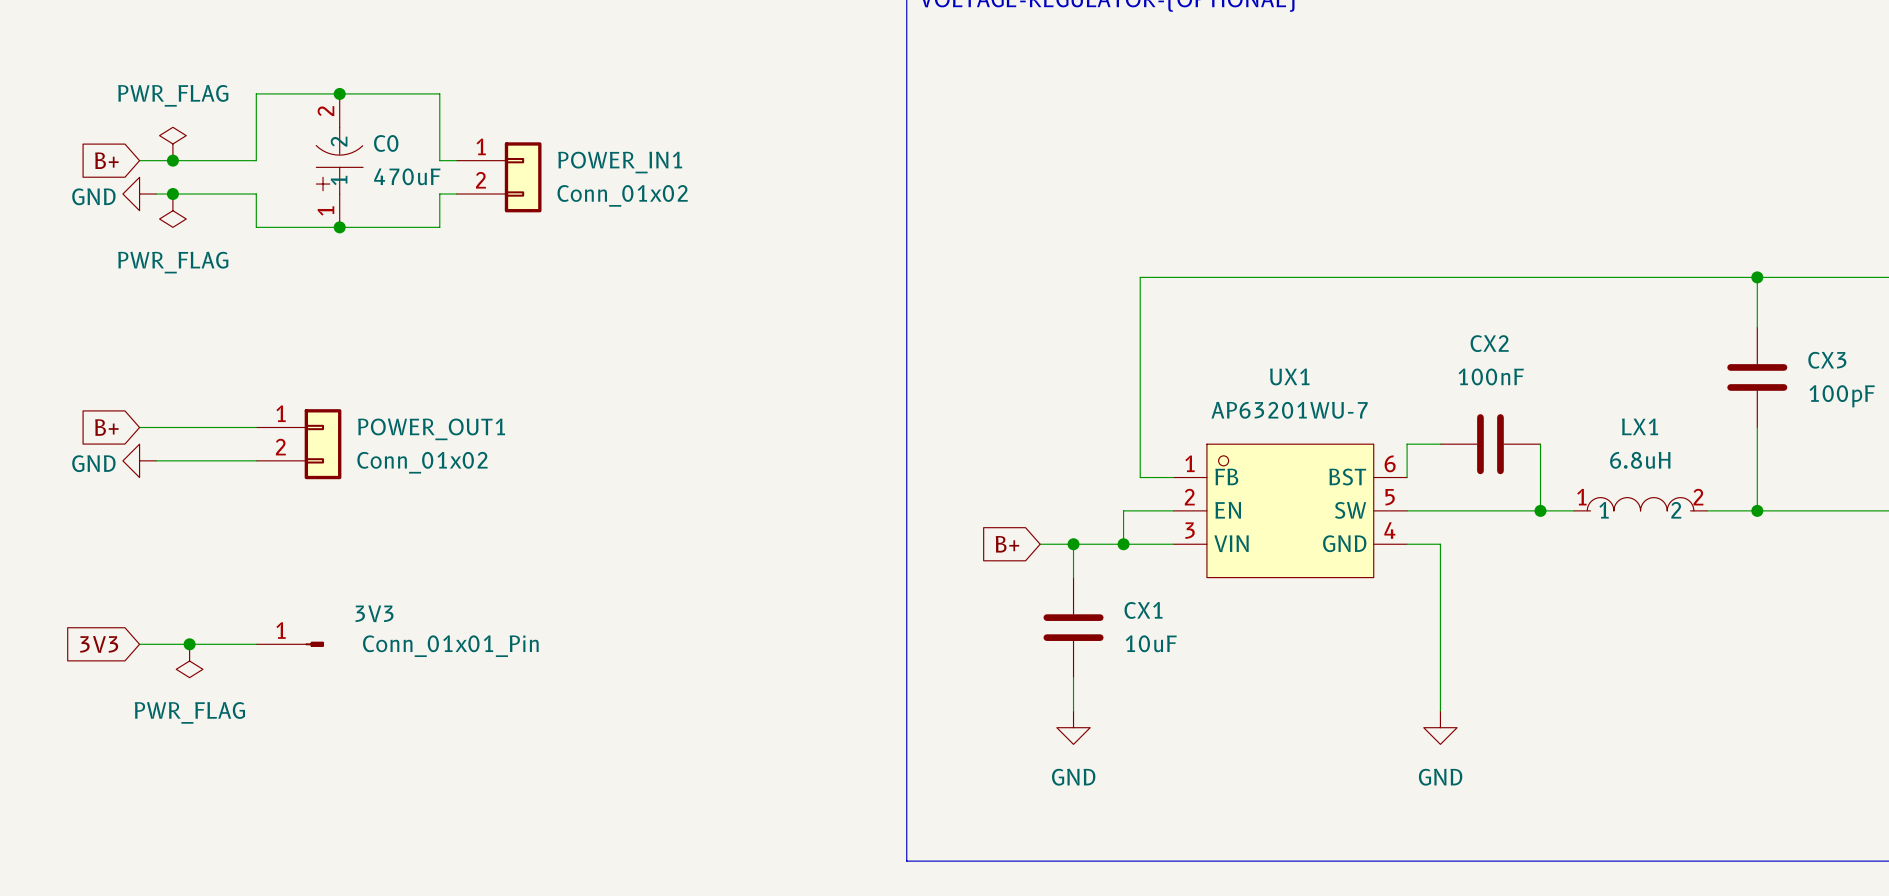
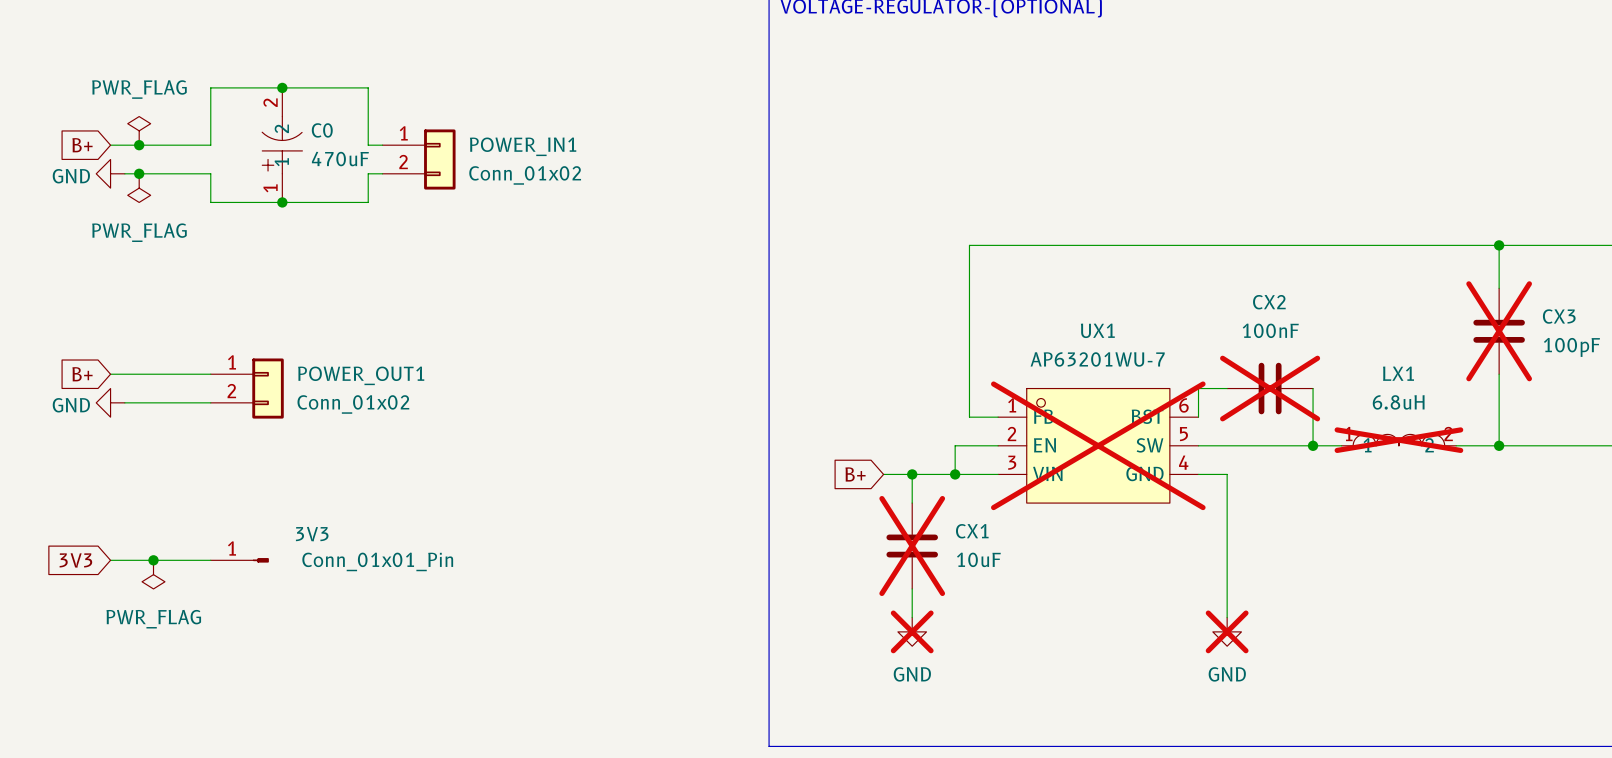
CX3 do-not-place cross: none -> (1499, 331)
CX2 do-not-place cross: none -> (1270, 388)
LX1 do-not-place cross: none -> (1398, 440)
UX1 do-not-place cross: none -> (1098, 445)
CX1 do-not-place cross: none -> (912, 546)
power symbol do-not-place cross: none -> (912, 631)
power symbol do-not-place cross: none -> (1227, 631)

